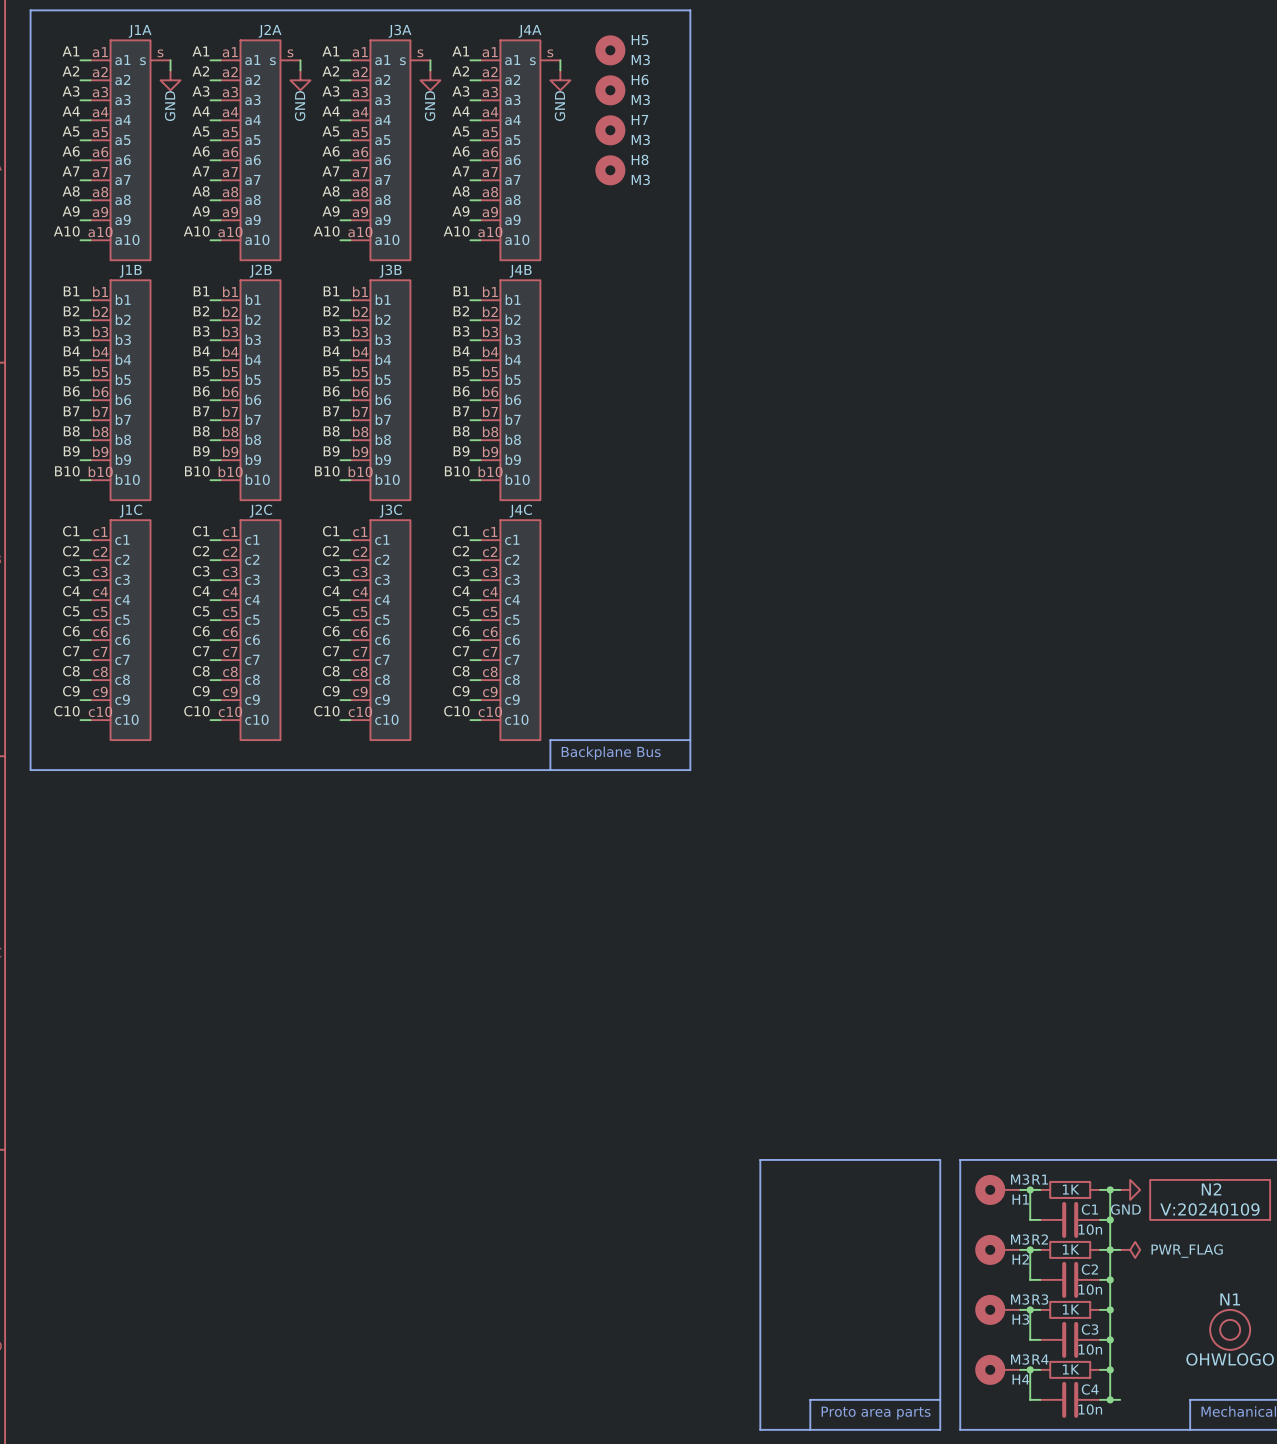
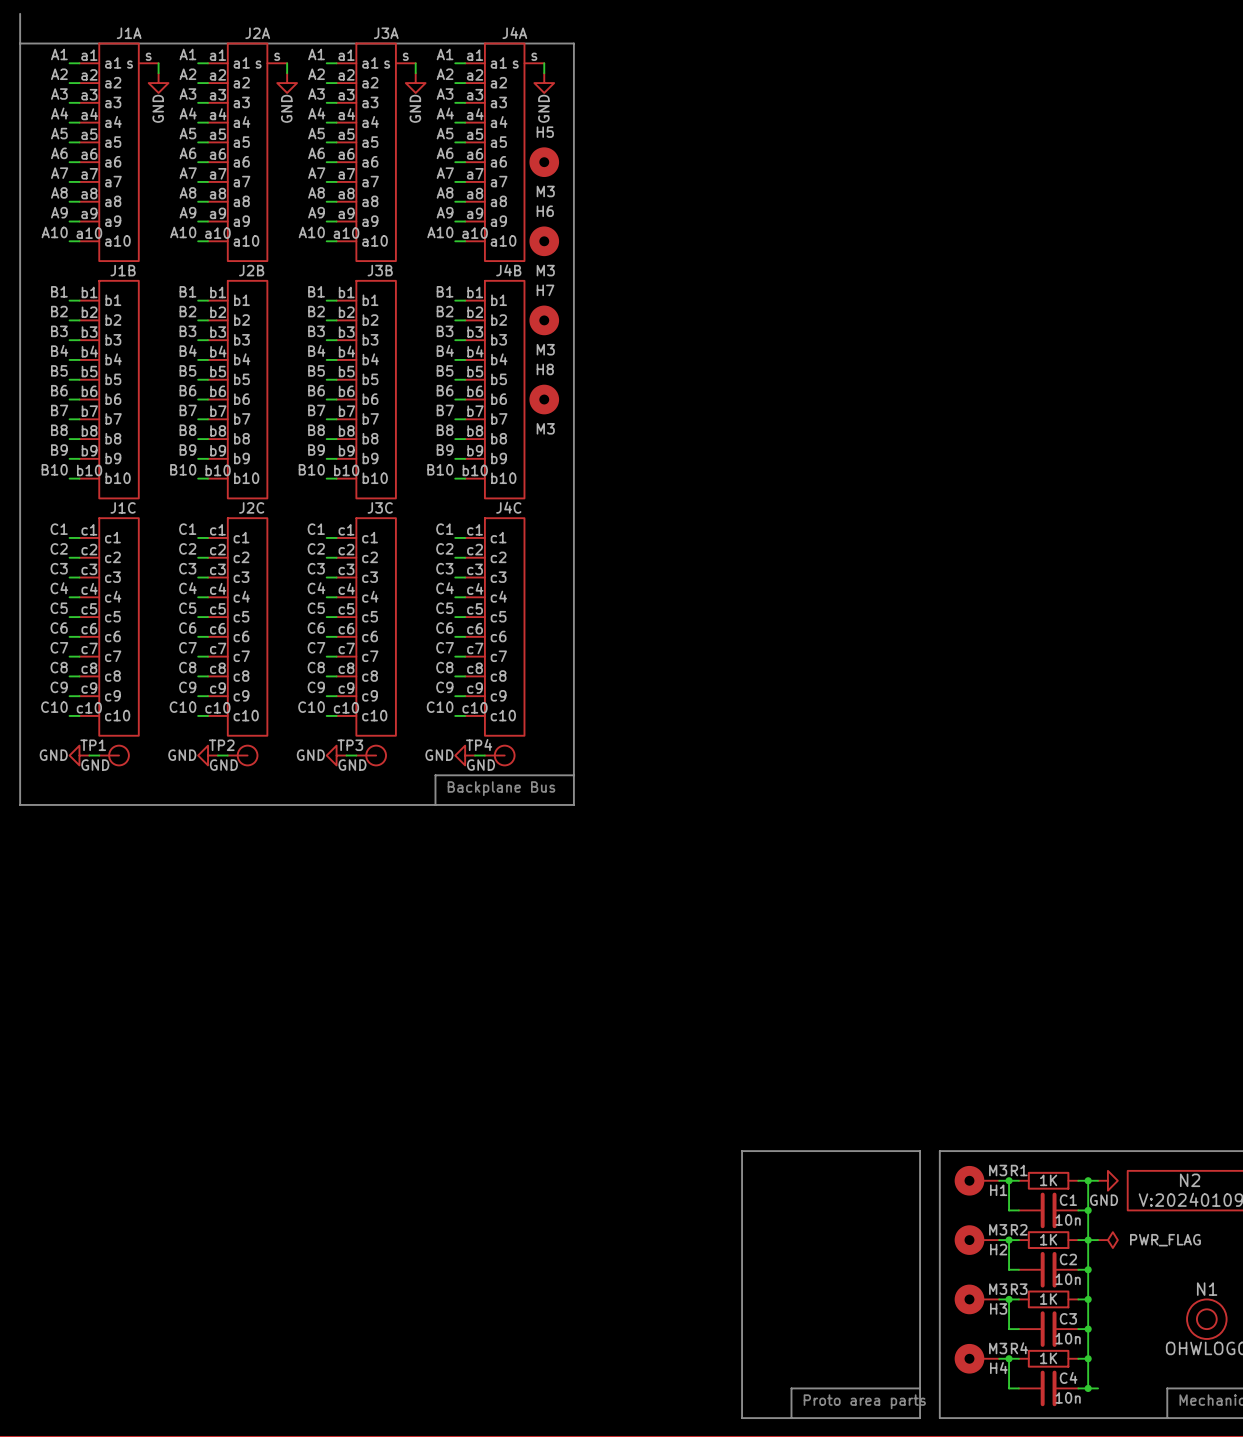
line: (30, 10) (690, 10) (690, 770) (30, 770) -> (20, 43) (573, 43) (573, 804) (20, 804) (20, 765)
H5 name position: H5 (639, 40) -> H5 (545, 132)
H5 position: (610, 50) -> (544, 162)
H5 value position: M3 (640, 59) -> M3 (545, 191)
H6 name position: H6 (640, 79) -> H6 (545, 211)
H6 position: (610, 90) -> (544, 241)
H6 value position: M3 (640, 99) -> M3 (545, 270)
H7 name position: H7 (639, 119) -> H7 (545, 290)
H7 position: (610, 130) -> (544, 320)
H7 value position: M3 (640, 139) -> M3 (545, 349)
H8 name position: H8 (640, 159) -> H8 (545, 369)
H8 position: (610, 170) -> (544, 399)
H8 value position: M3 (640, 179) -> M3 (545, 428)
line: (690, 740) (550, 740) (550, 770) -> (573, 775) (435, 775) (435, 804)
text position: Backplane Bus (611, 753) -> Backplane Bus (501, 788)
power symbol: none -> GND (79, 755)
wire: none -> (89, 755) (99, 755)
TP1: none -> GND (114, 755)
power symbol: none -> GND (208, 755)
wire: none -> (217, 755) (227, 755)
TP2: none -> GND (242, 755)
power symbol: none -> GND (336, 755)
wire: none -> (346, 755) (356, 755)
TP3: none -> GND (371, 755)
power symbol: none -> GND (465, 755)
wire: none -> (475, 755) (484, 755)
TP4: none -> GND (499, 755)

